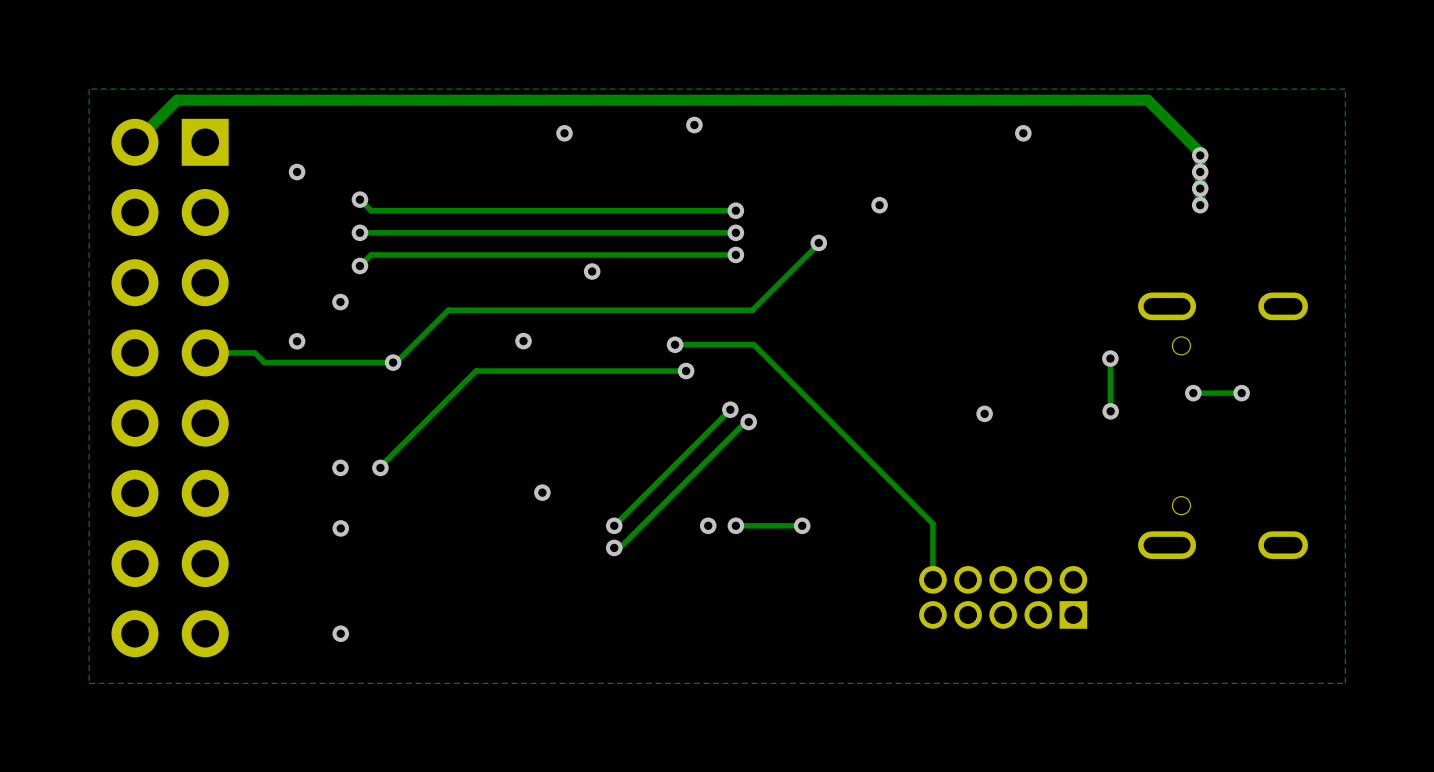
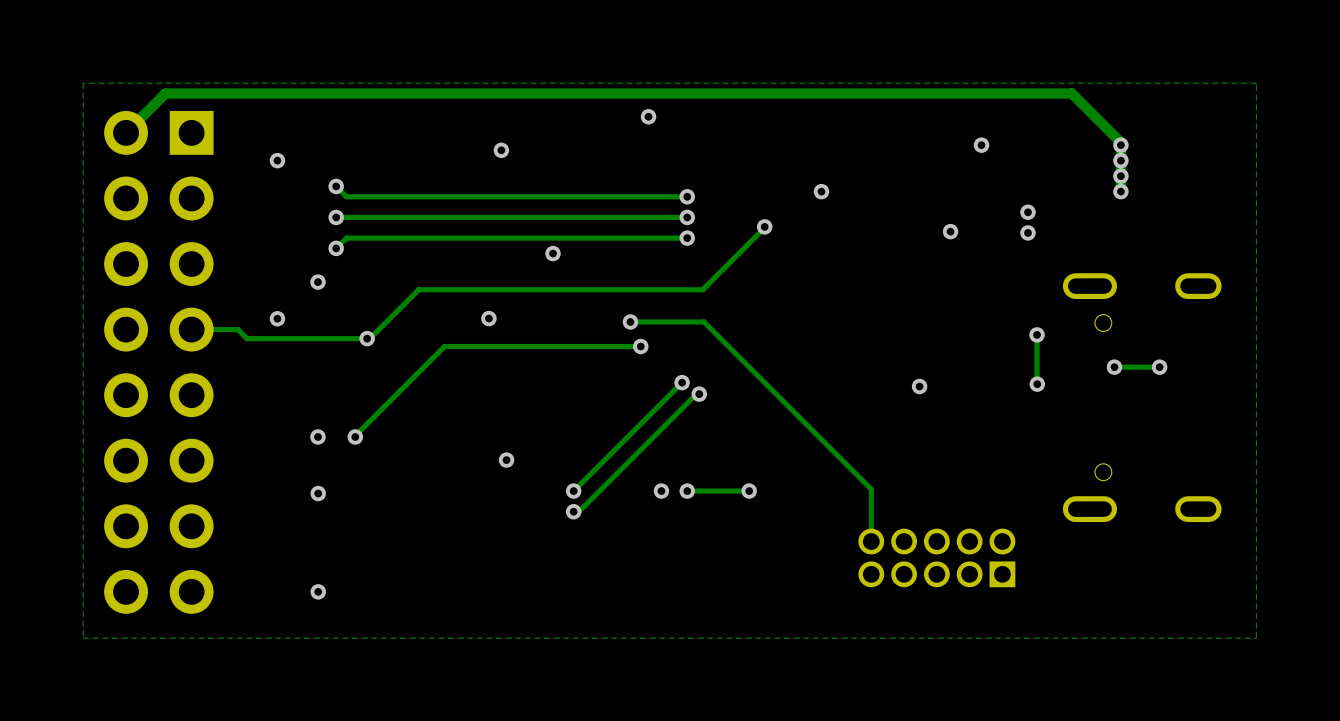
via position: (564, 133) -> (501, 150)
via position: (1023, 133) -> (981, 145)
via: none -> (1027, 212)
via: none -> (950, 231)
via: none -> (1027, 232)

